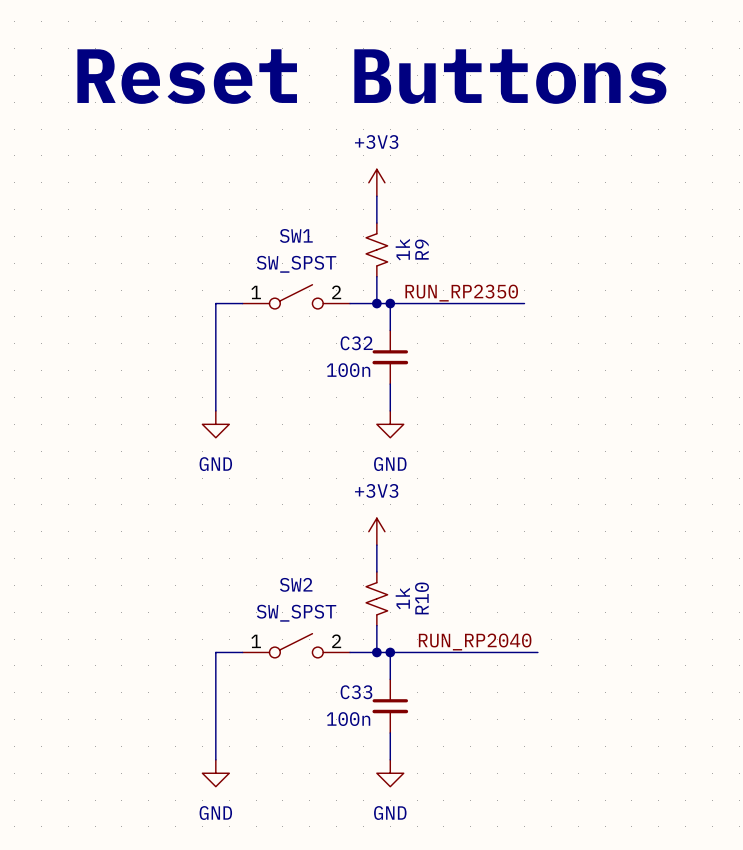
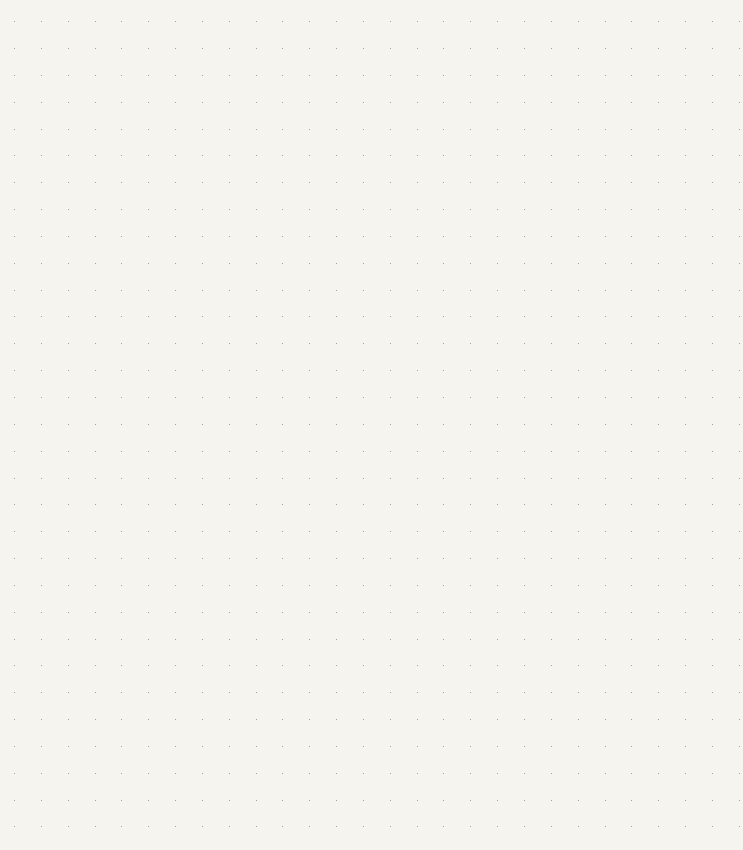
text: Reset Buttons (371, 76) -> none
power symbol: +3V3 (376, 182) -> none
wire: (376, 196) (376, 223) -> none
R9: 1k (376, 249) -> none
wire: (376, 276) (376, 303) -> none
label: RUN_RP2350 (461, 293) -> none
SW1: SW_SPST (296, 296) -> none
wire: (242, 303) (215, 303) (215, 410) -> none
wire: (350, 303) (524, 303) -> none
junction: (376, 303) -> none
wire: (390, 303) (390, 330) -> none
junction: (390, 303) -> none
C32: 100n (390, 357) -> none
wire: (390, 384) (390, 410) -> none
power symbol: GND (215, 424) -> none
power symbol: GND (390, 424) -> none
power symbol: +3V3 (376, 531) -> none
wire: (376, 545) (376, 571) -> none
R10: 1k (376, 598) -> none
wire: (376, 625) (376, 652) -> none
label: RUN_RP2040 (475, 642) -> none
SW2: SW_SPST (296, 645) -> none
wire: (242, 652) (215, 652) (215, 759) -> none
wire: (350, 652) (537, 652) -> none
junction: (376, 652) -> none
wire: (390, 652) (390, 679) -> none
junction: (390, 652) -> none
C33: 100n (390, 706) -> none
wire: (390, 732) (390, 759) -> none
power symbol: GND (215, 773) -> none
power symbol: GND (390, 773) -> none

